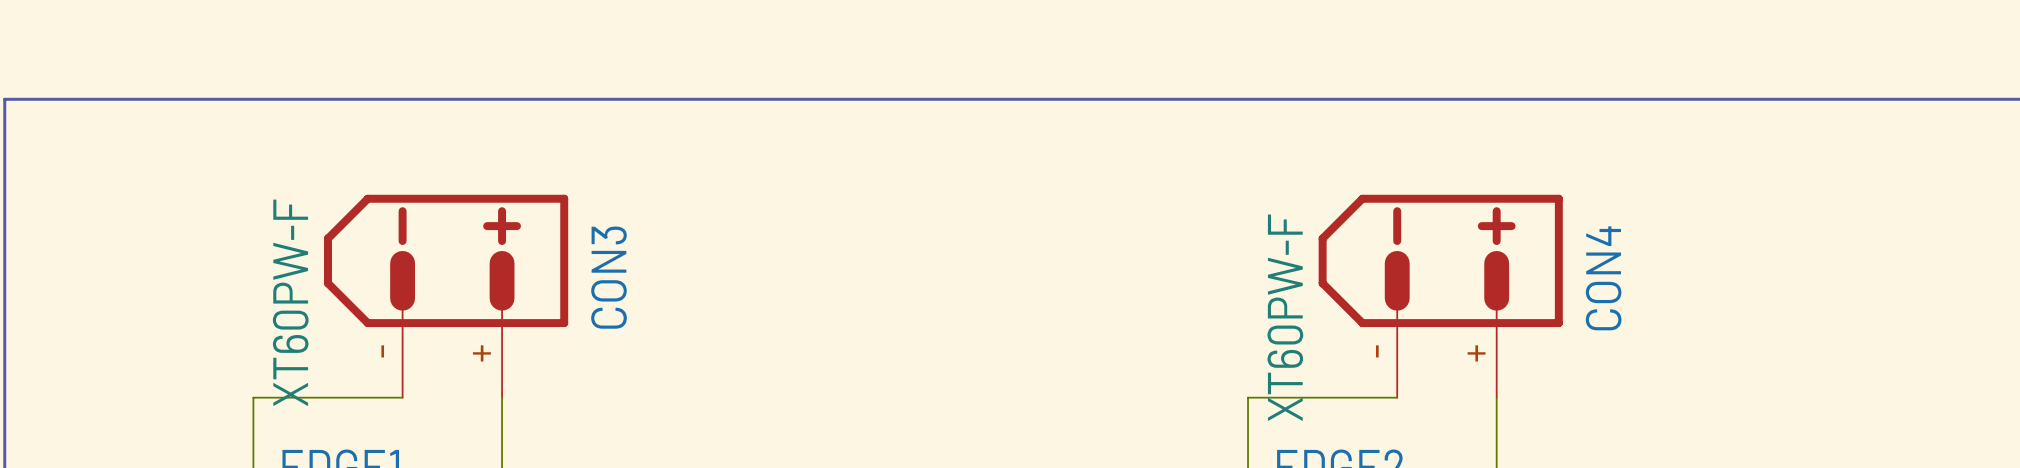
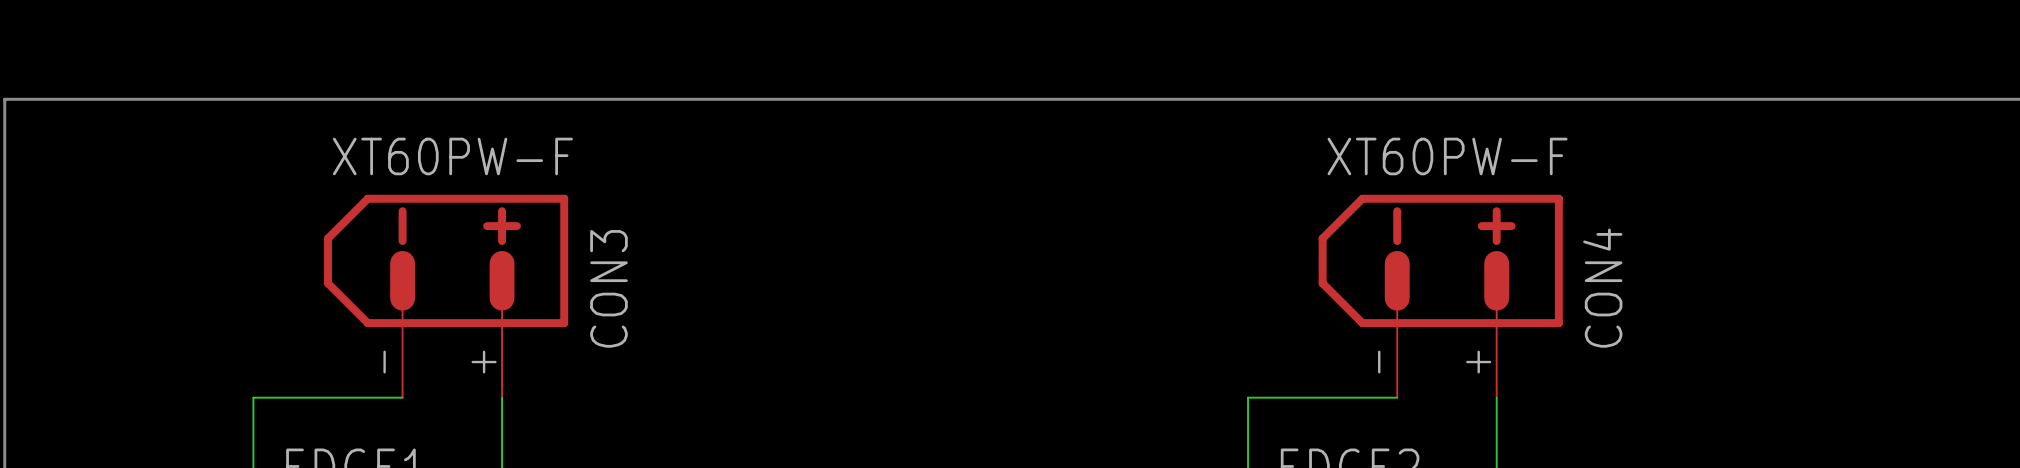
CON3 value rotation: 0° (290, 302) -> 90° clockwise (452, 156)
CON4 value rotation: 0° (1285, 317) -> 90° clockwise (1447, 156)

